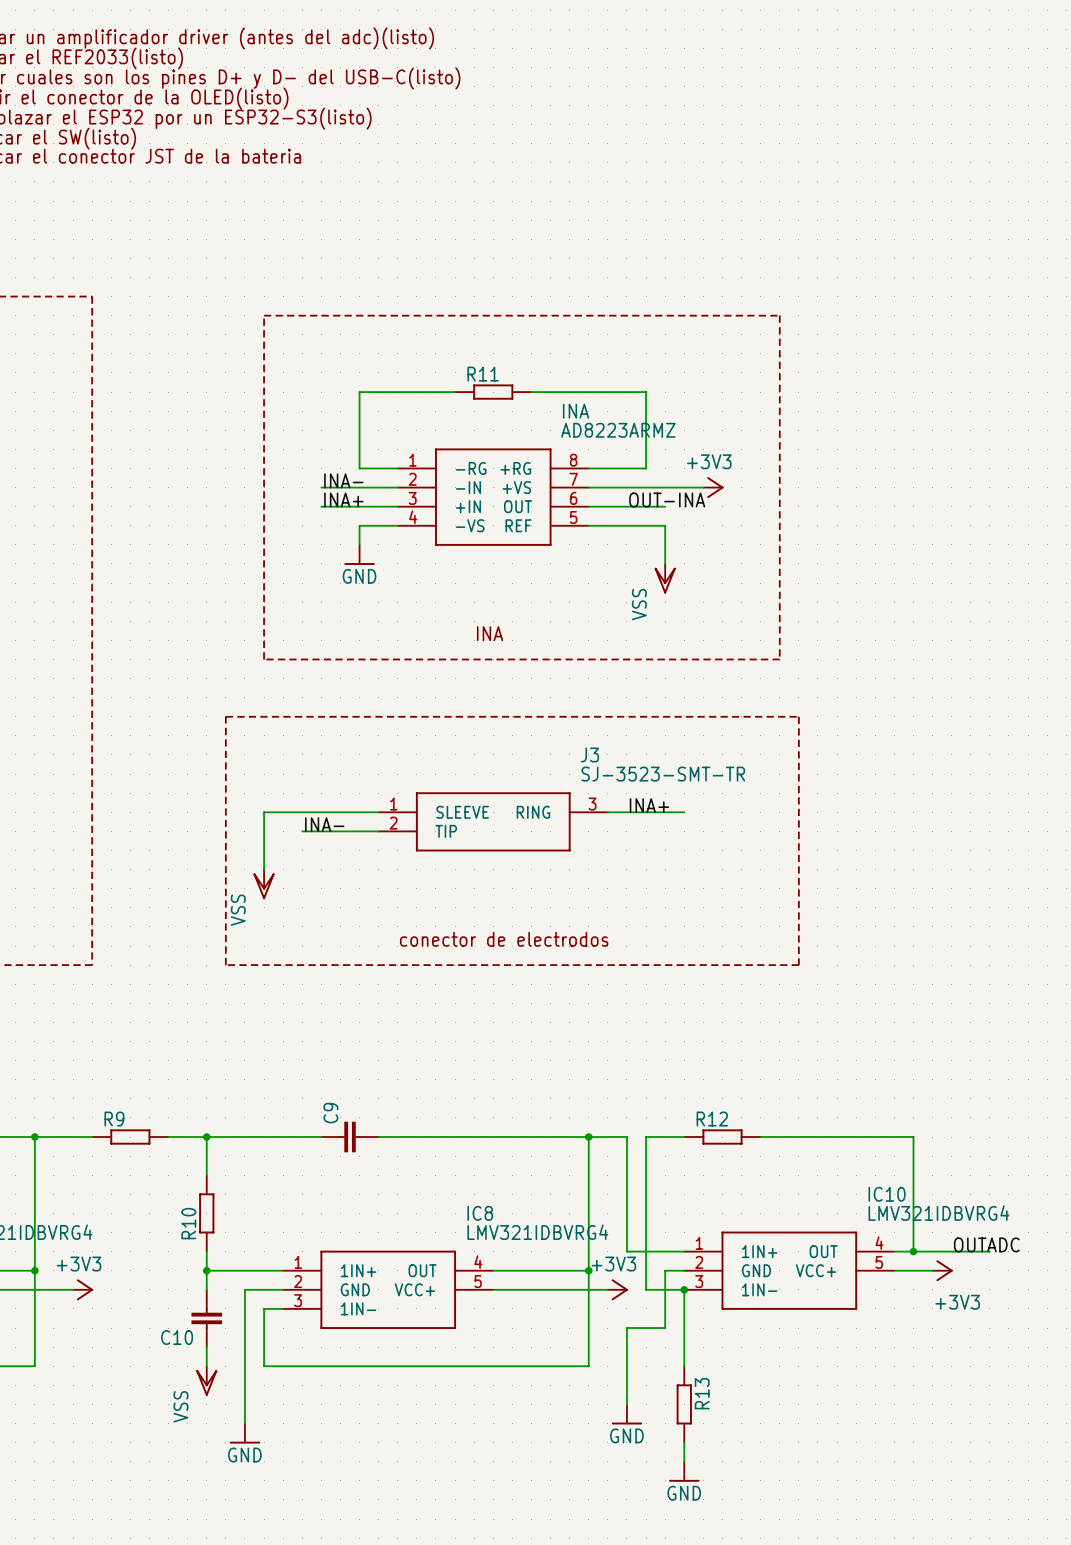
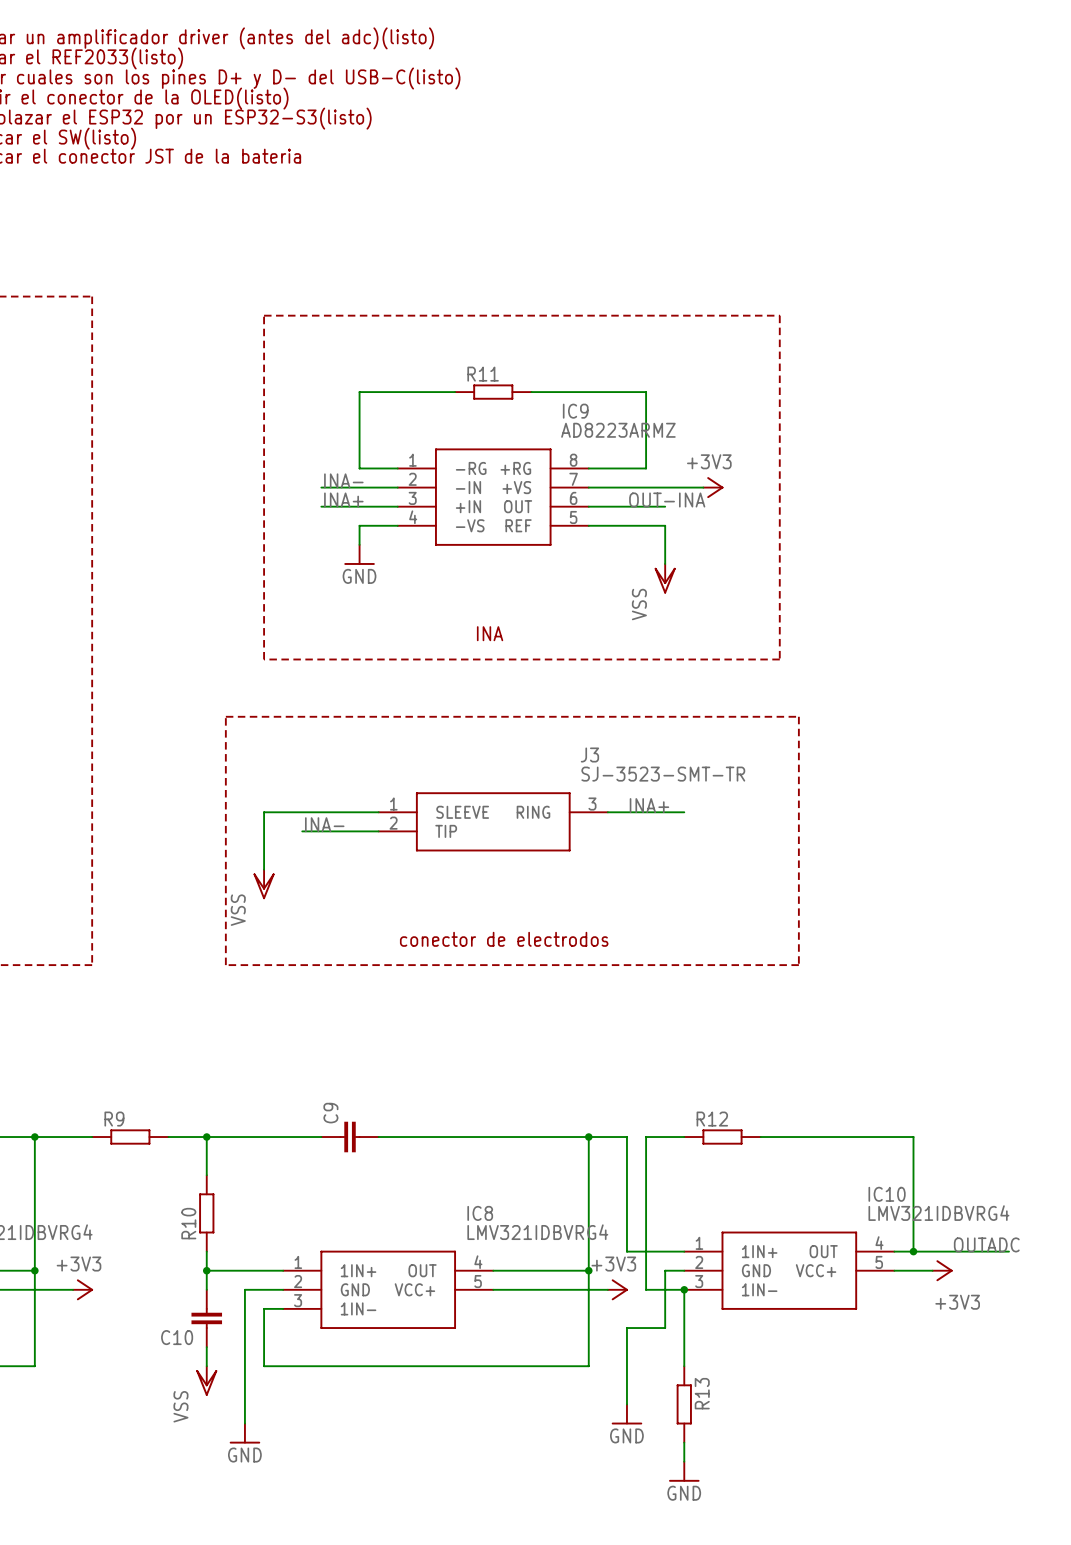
INA name: INA (576, 411) -> IC9 (575, 411)
wire: none -> (989, 1251) (1008, 1251)

